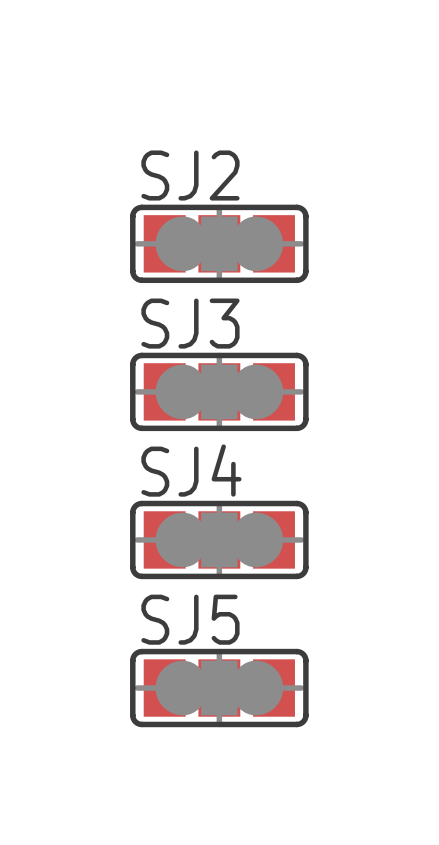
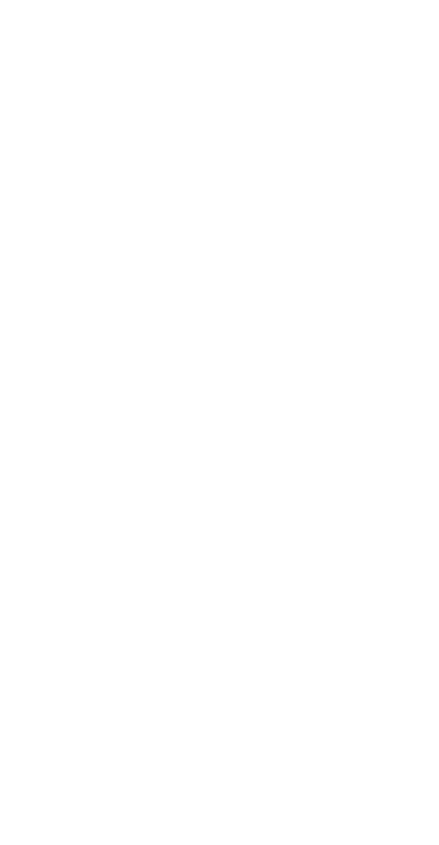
SJ2: (219, 243) -> none
SJ3: (219, 391) -> none
SJ4: (219, 539) -> none
SJ5: (219, 688) -> none

